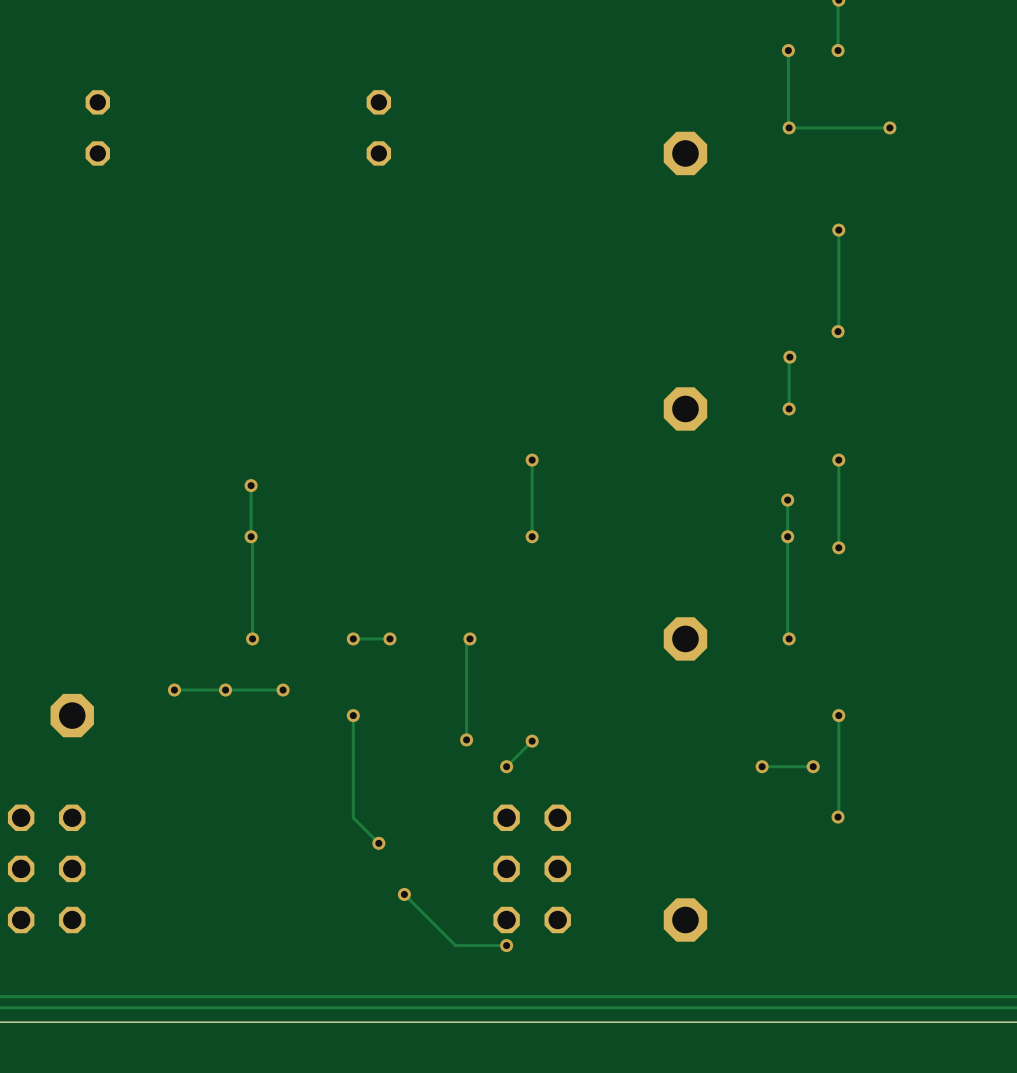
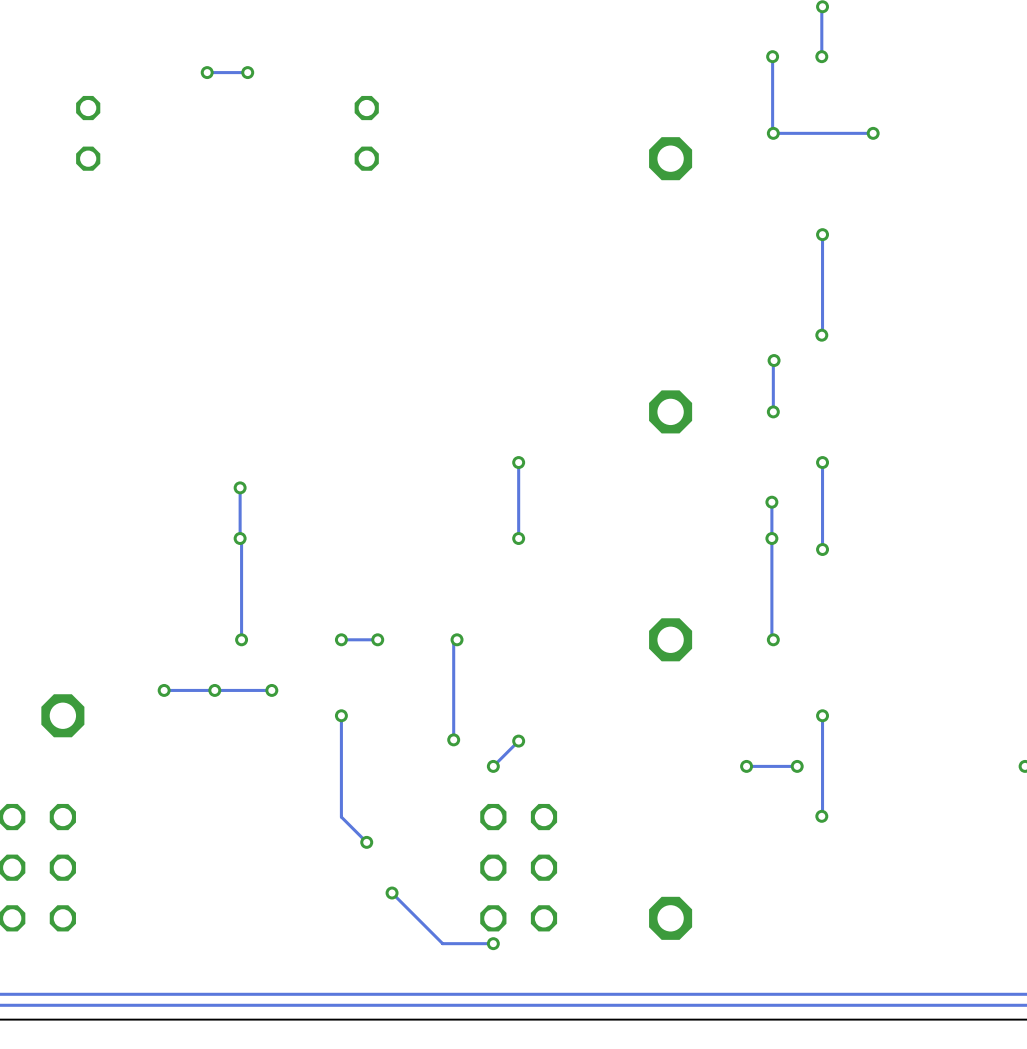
via: none -> (207, 72)
track: none -> (247, 72) (207, 72)
via: none -> (247, 72)

